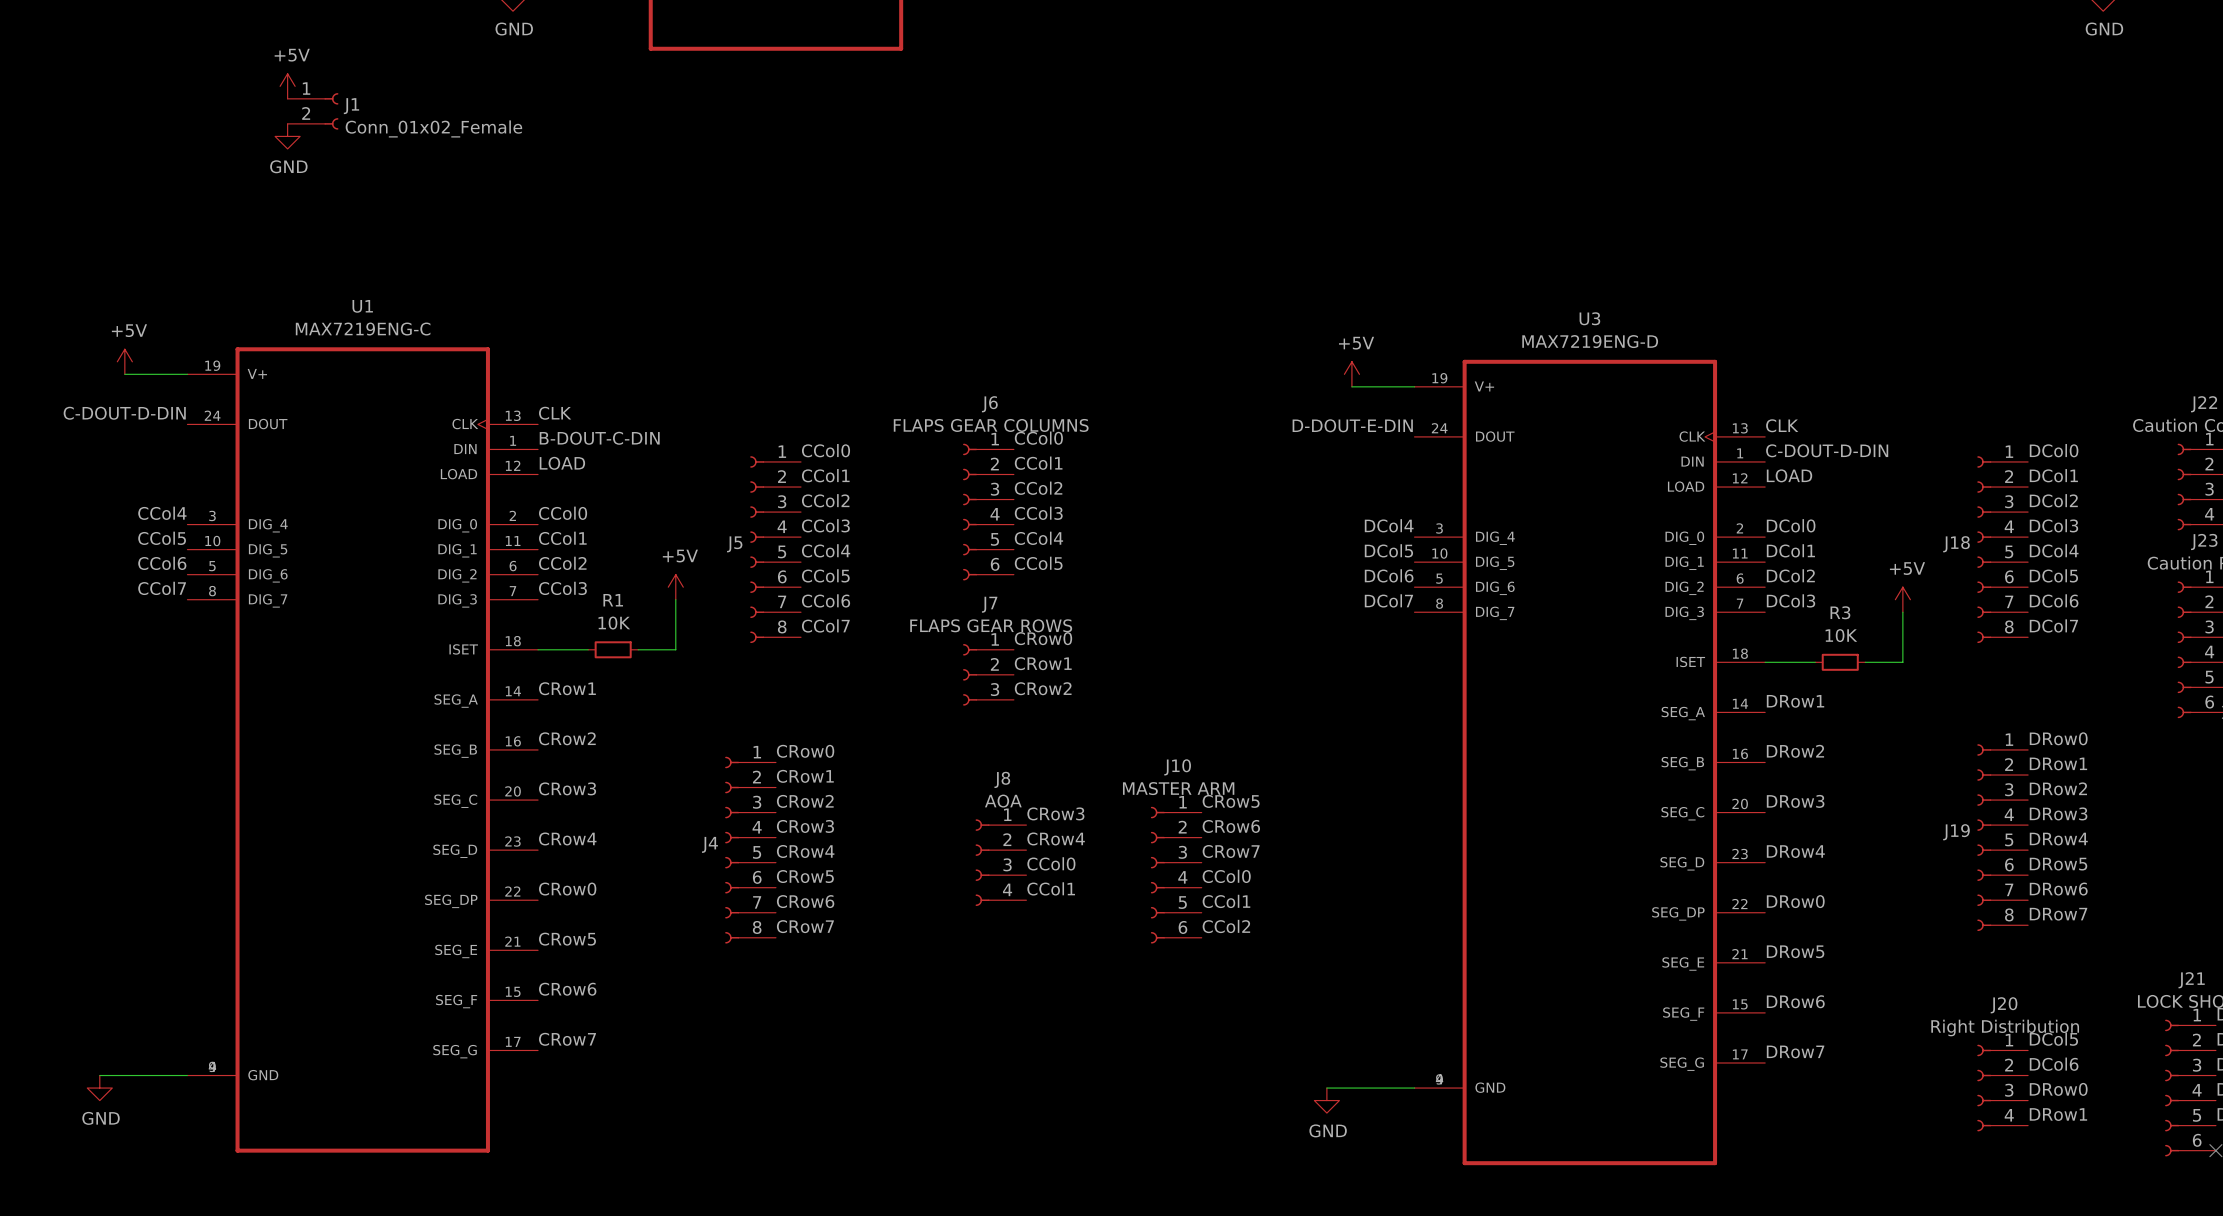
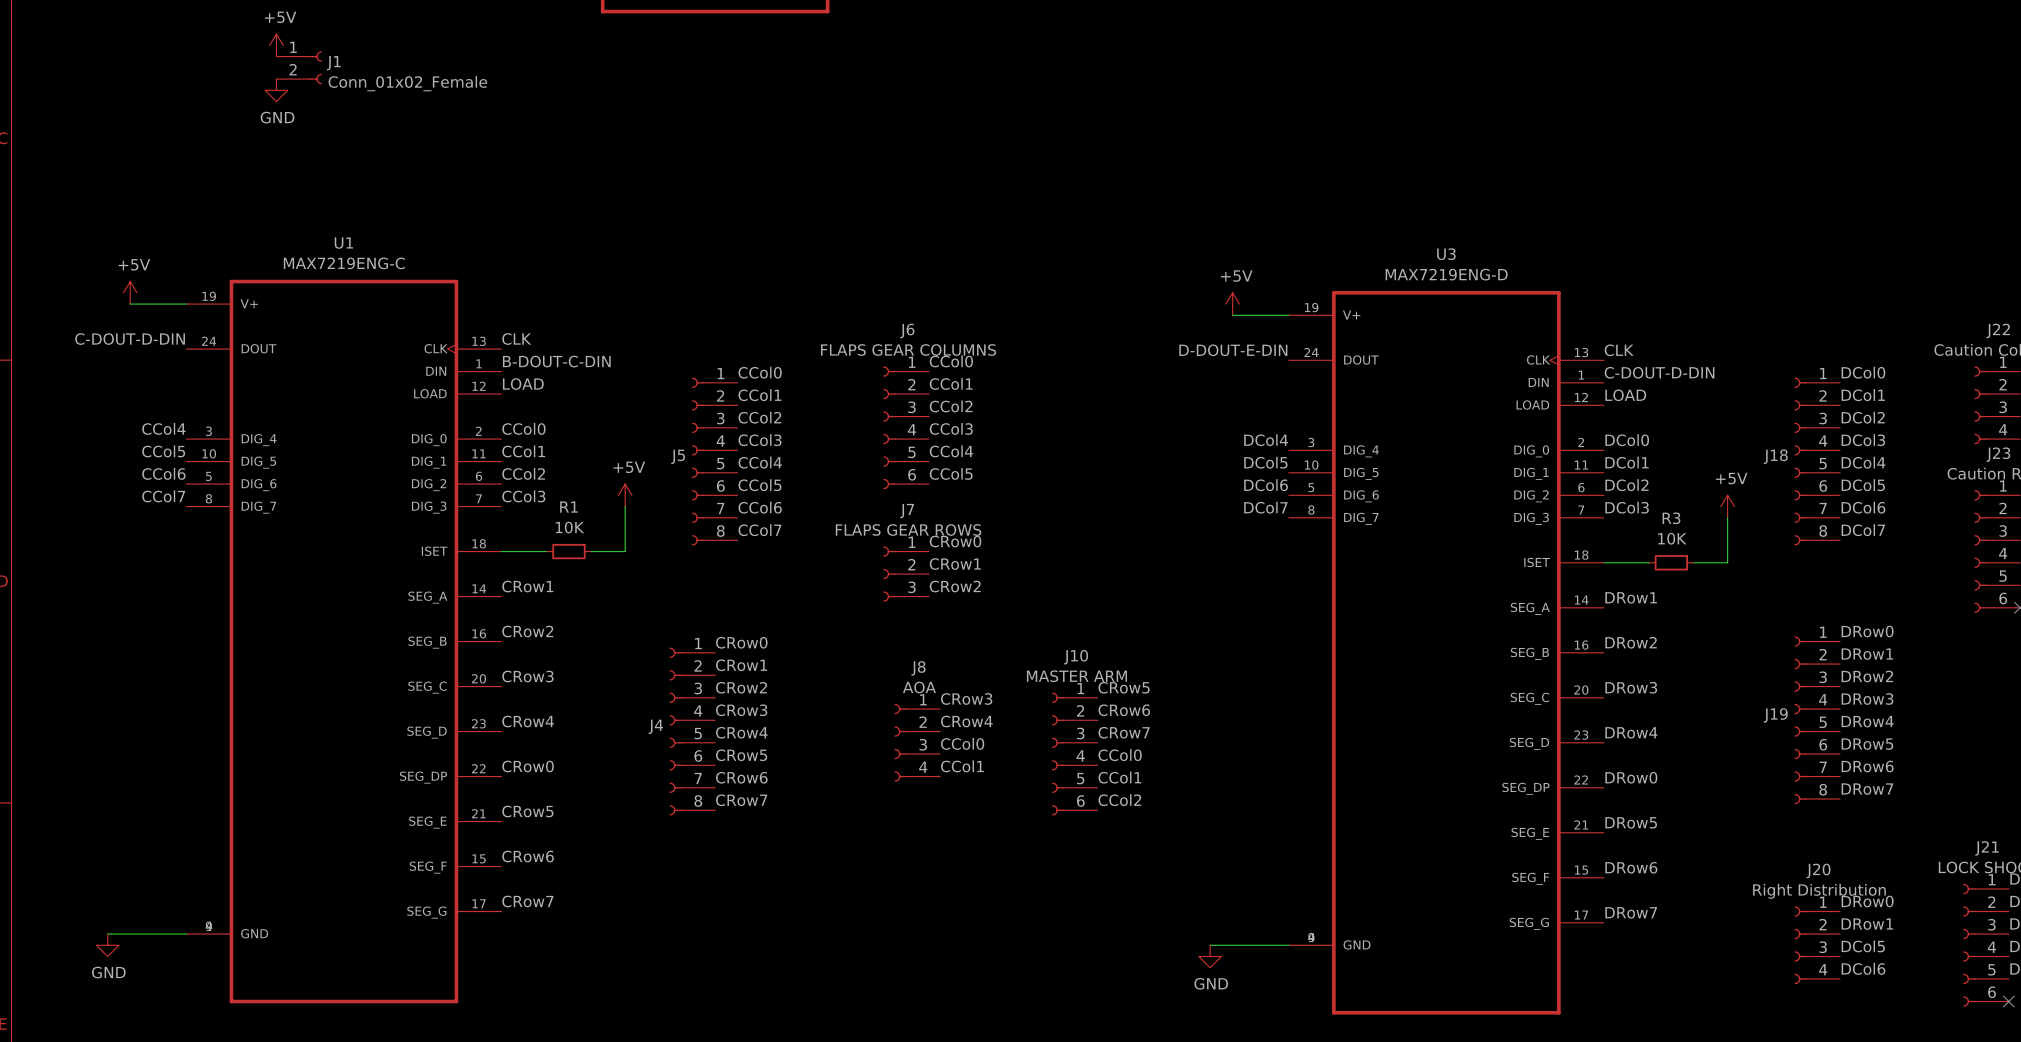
label: DCol5 (2053, 1039) -> DRow0 (1867, 901)
label: DCol6 (2054, 1064) -> DRow1 (1867, 924)
label: DRow0 (2058, 1089) -> DCol5 (1863, 946)
label: DRow1 (2058, 1114) -> DCol6 (1863, 968)

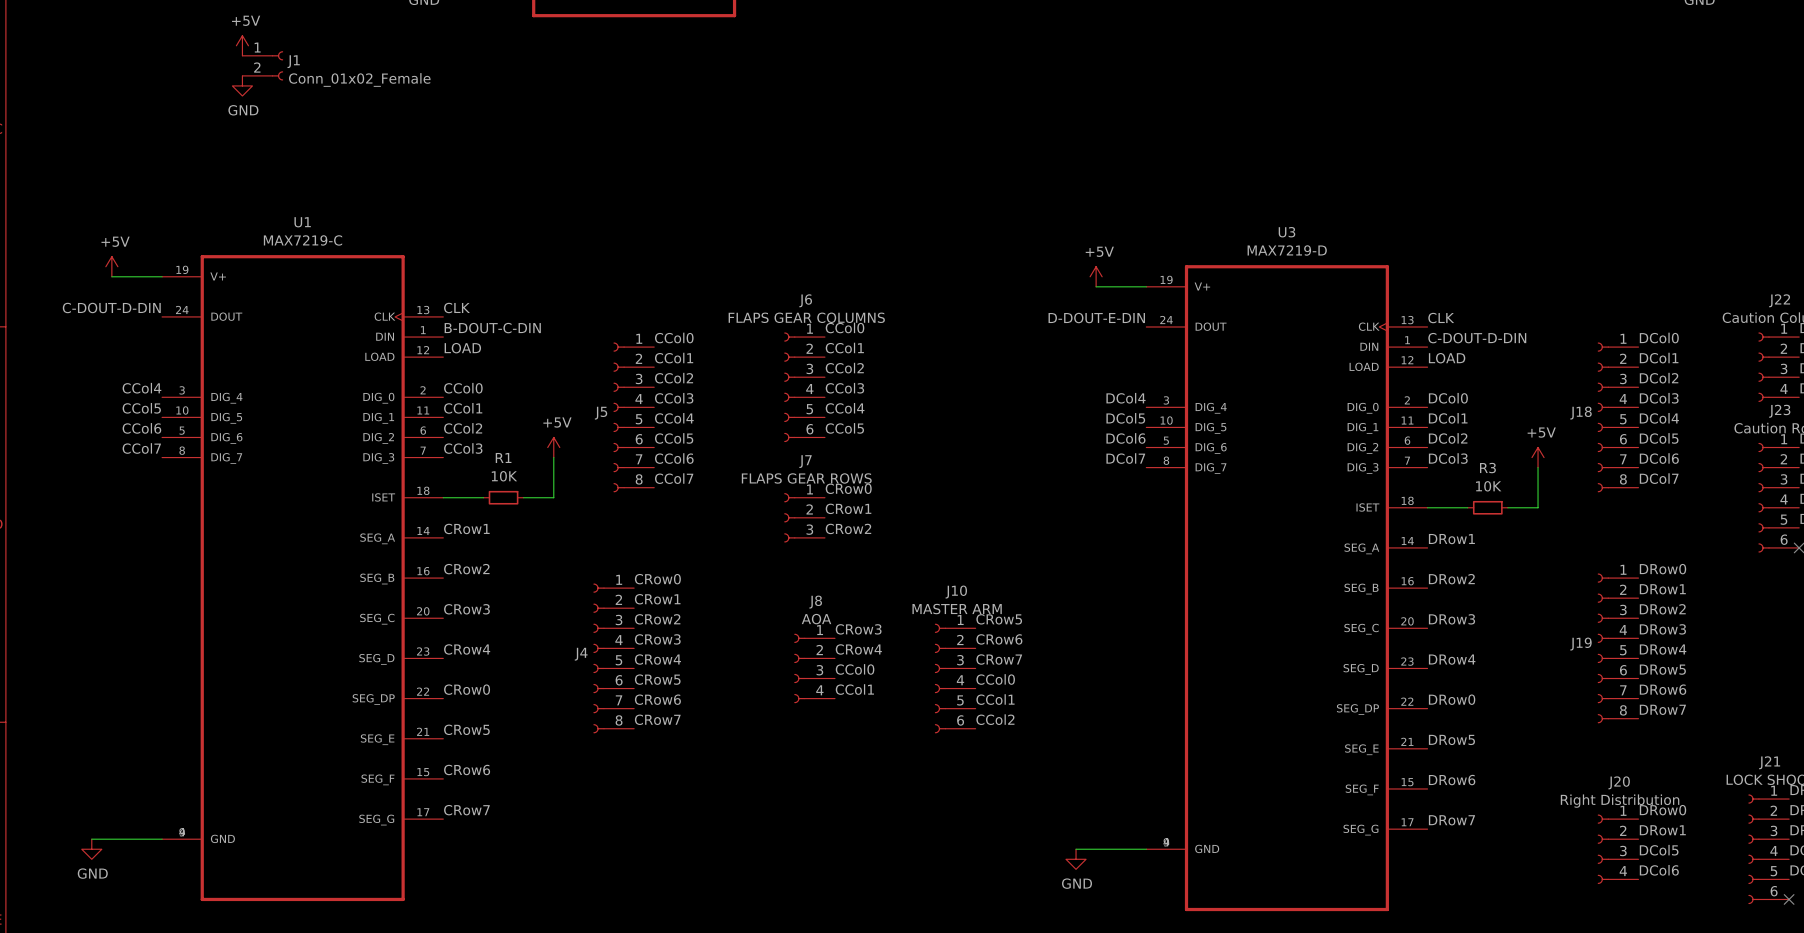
U1 value: MAX7219ENG-C (344, 263) -> MAX7219-C (302, 240)
U3 value: MAX7219ENG-D (1446, 274) -> MAX7219-D (1287, 250)

